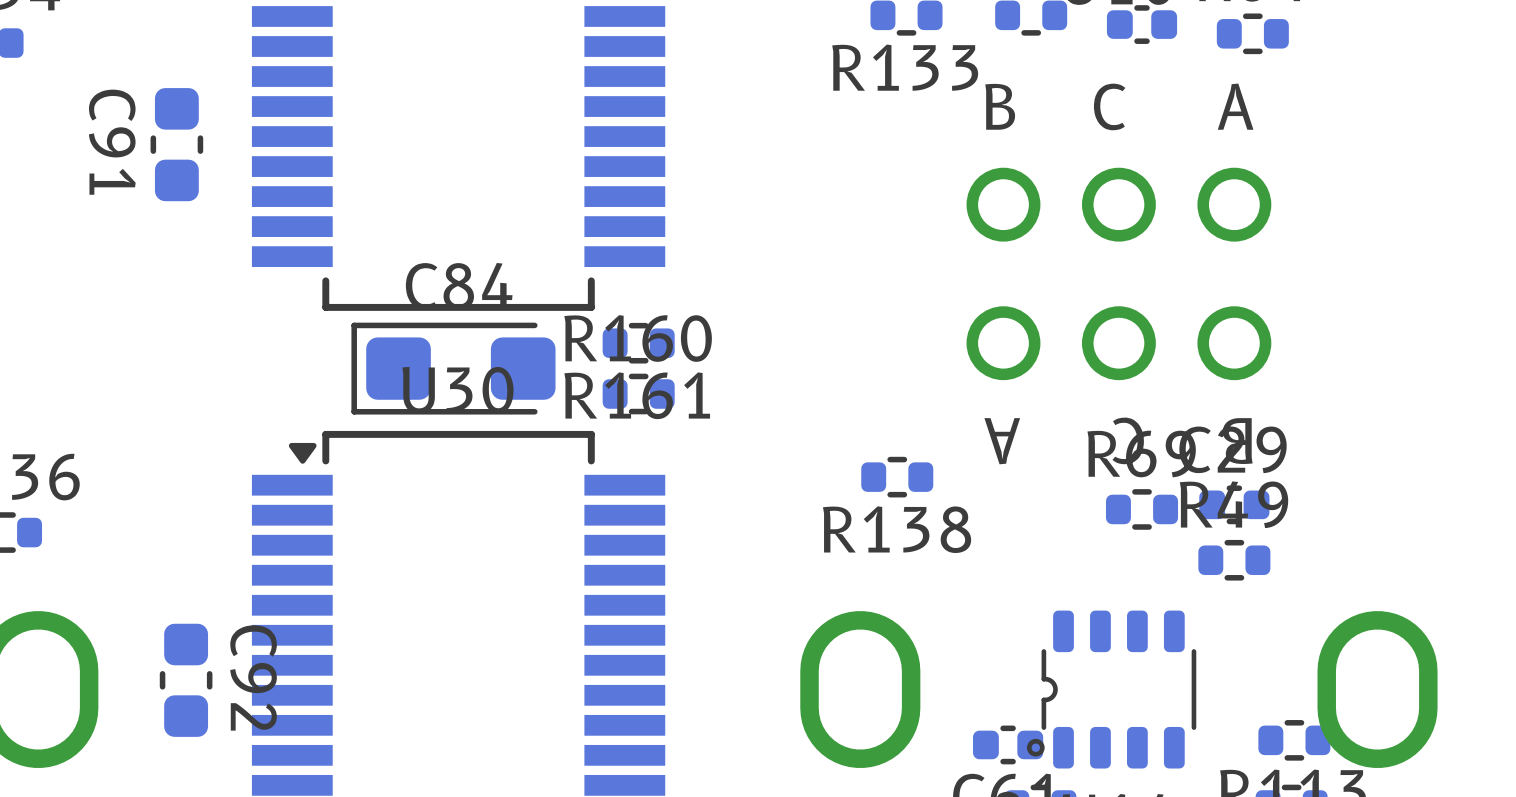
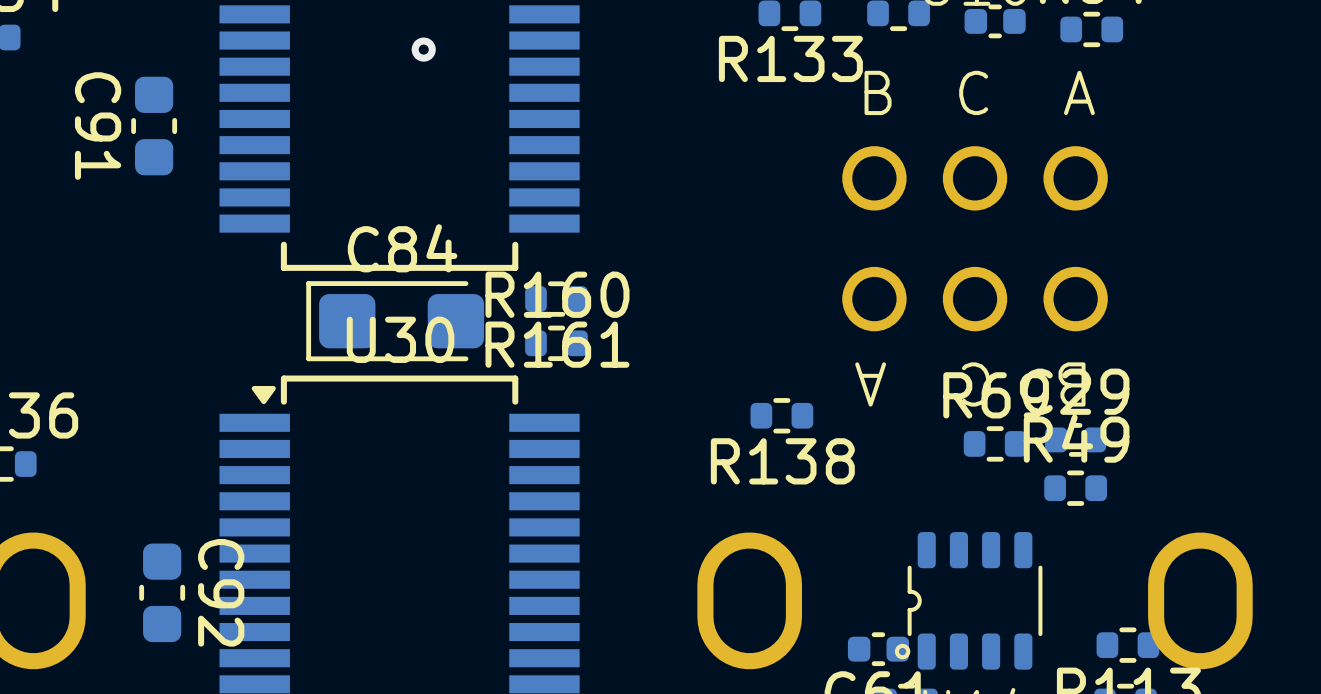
via: none -> (423, 49)

